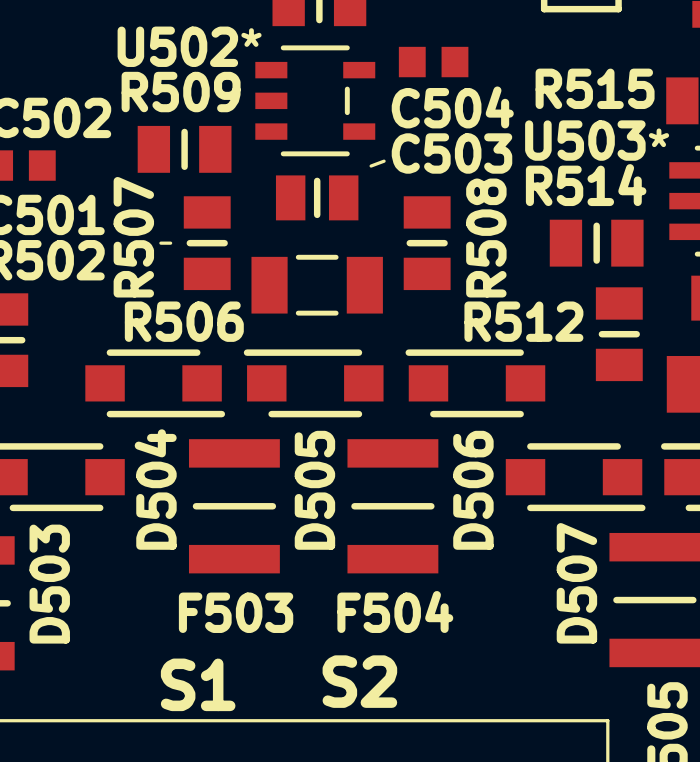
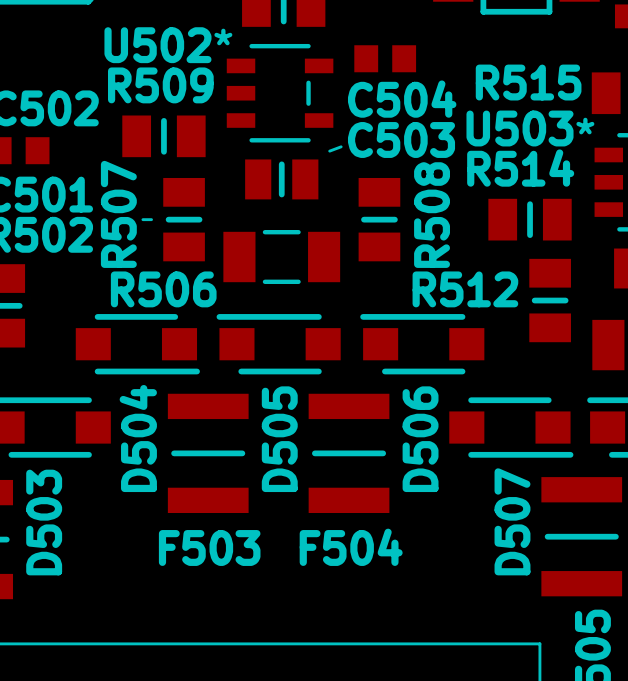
text: S2 (359, 681) -> none
text: S1 (198, 684) -> none

